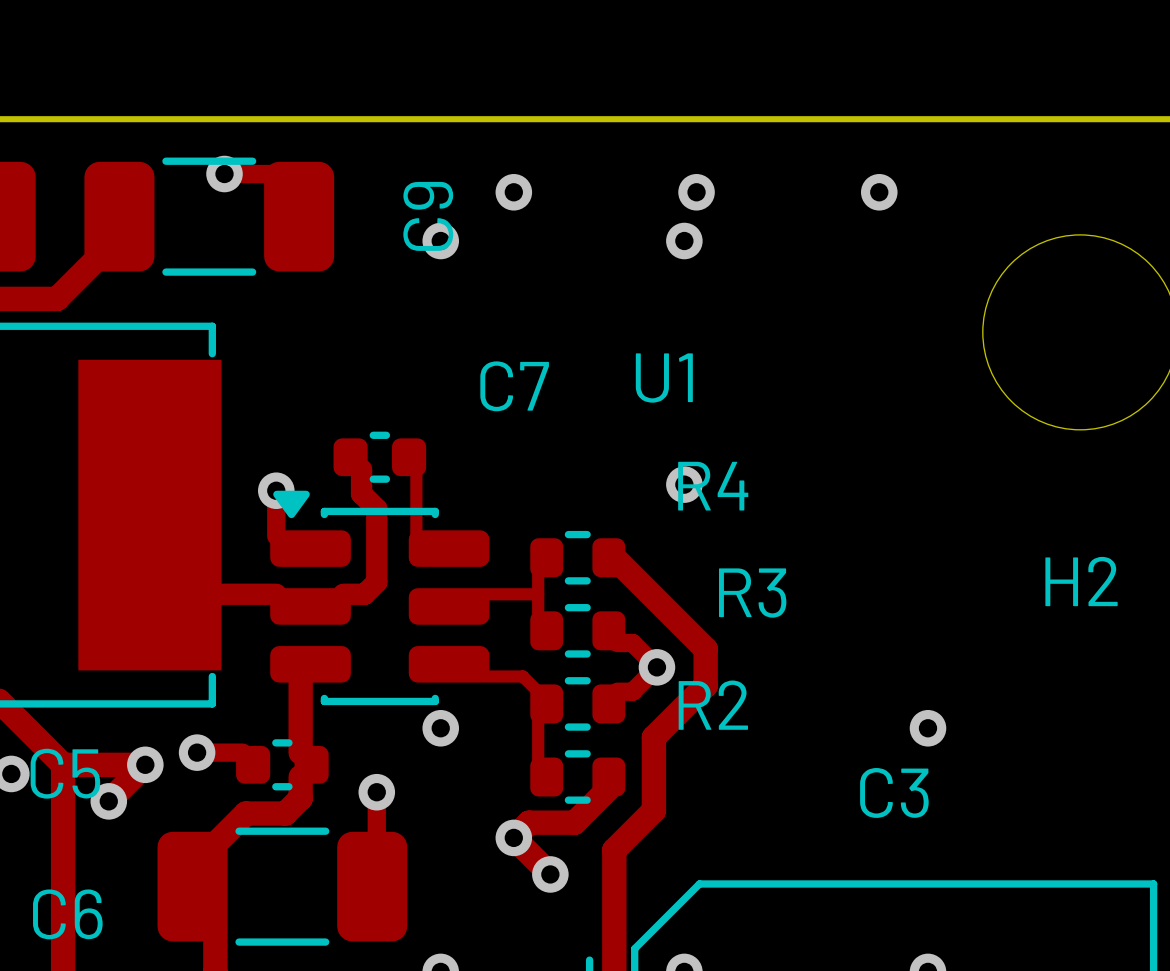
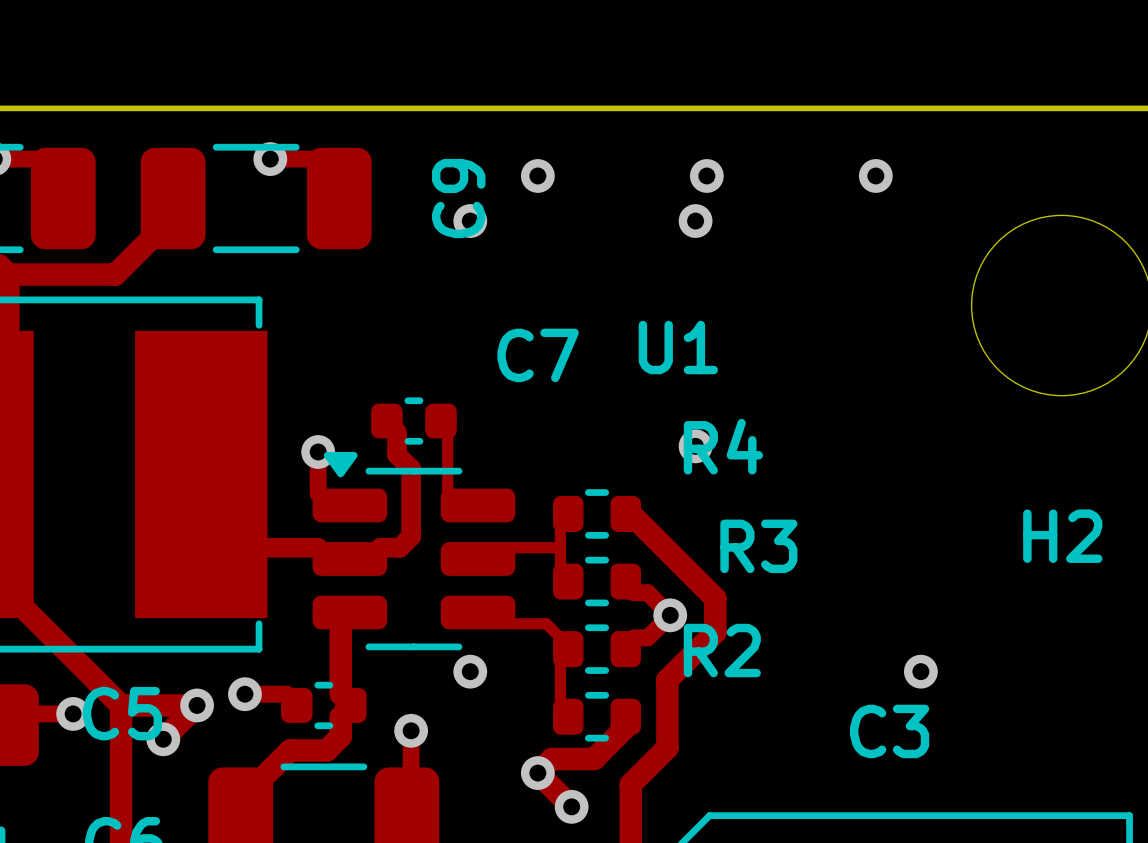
U1 footprint: [270, 490, 490, 706] -> [312, 451, 516, 651]

